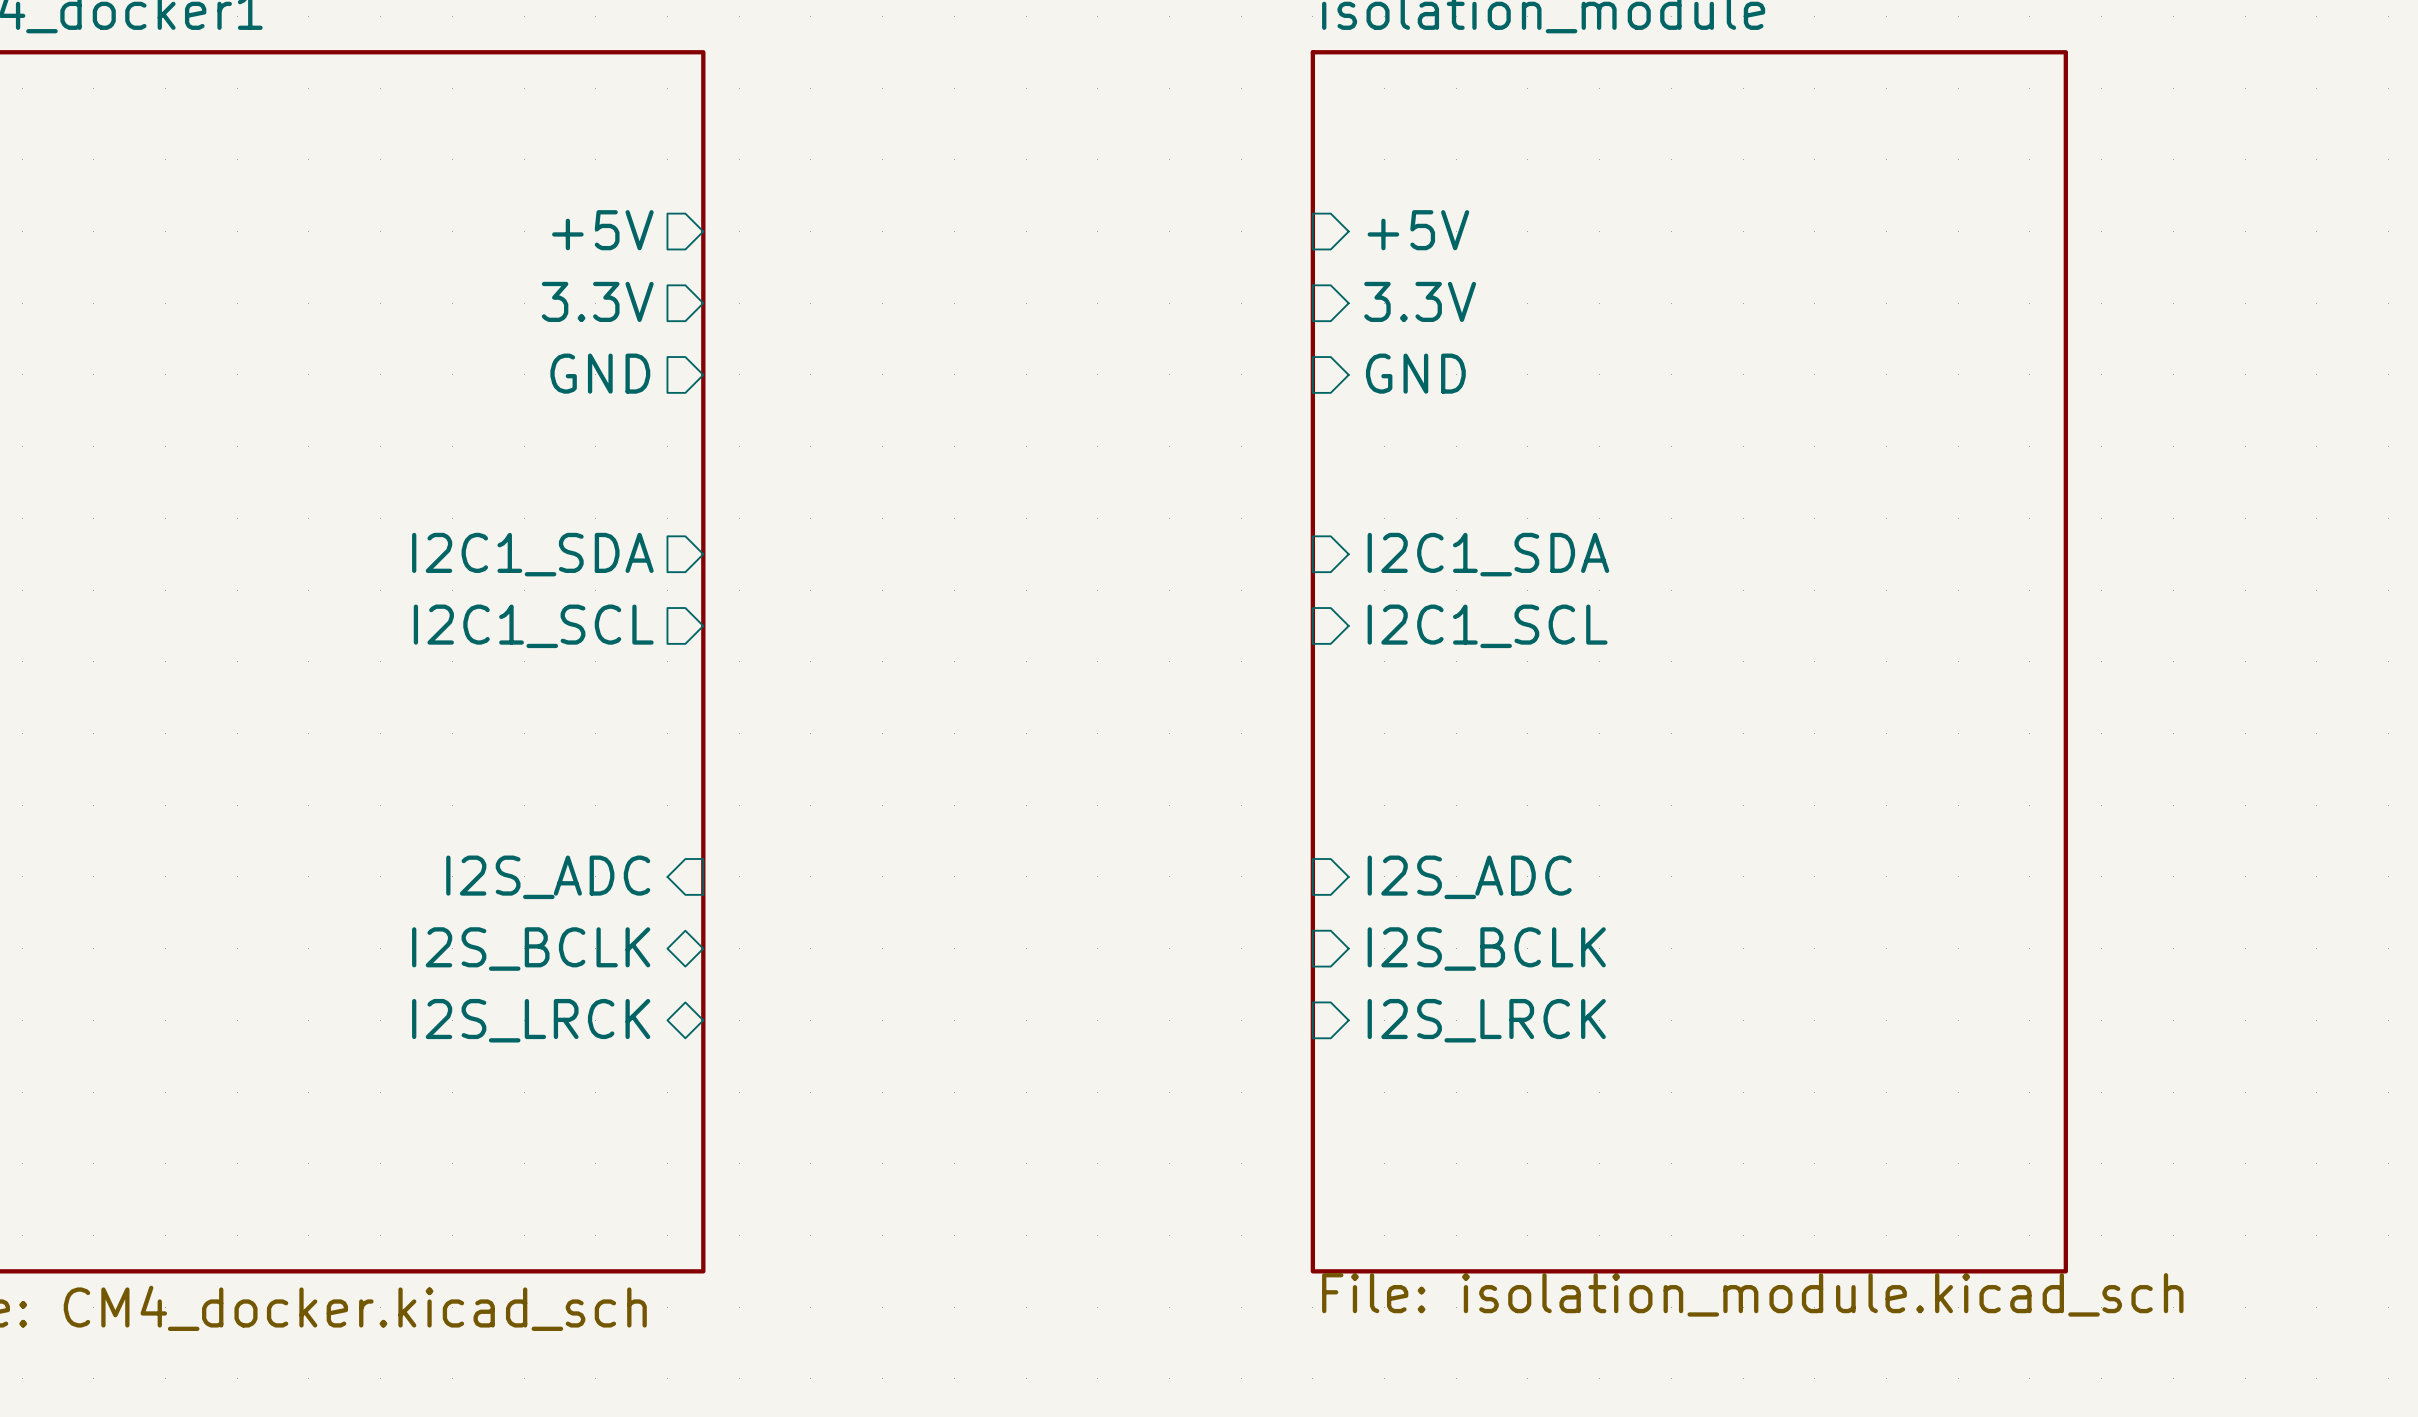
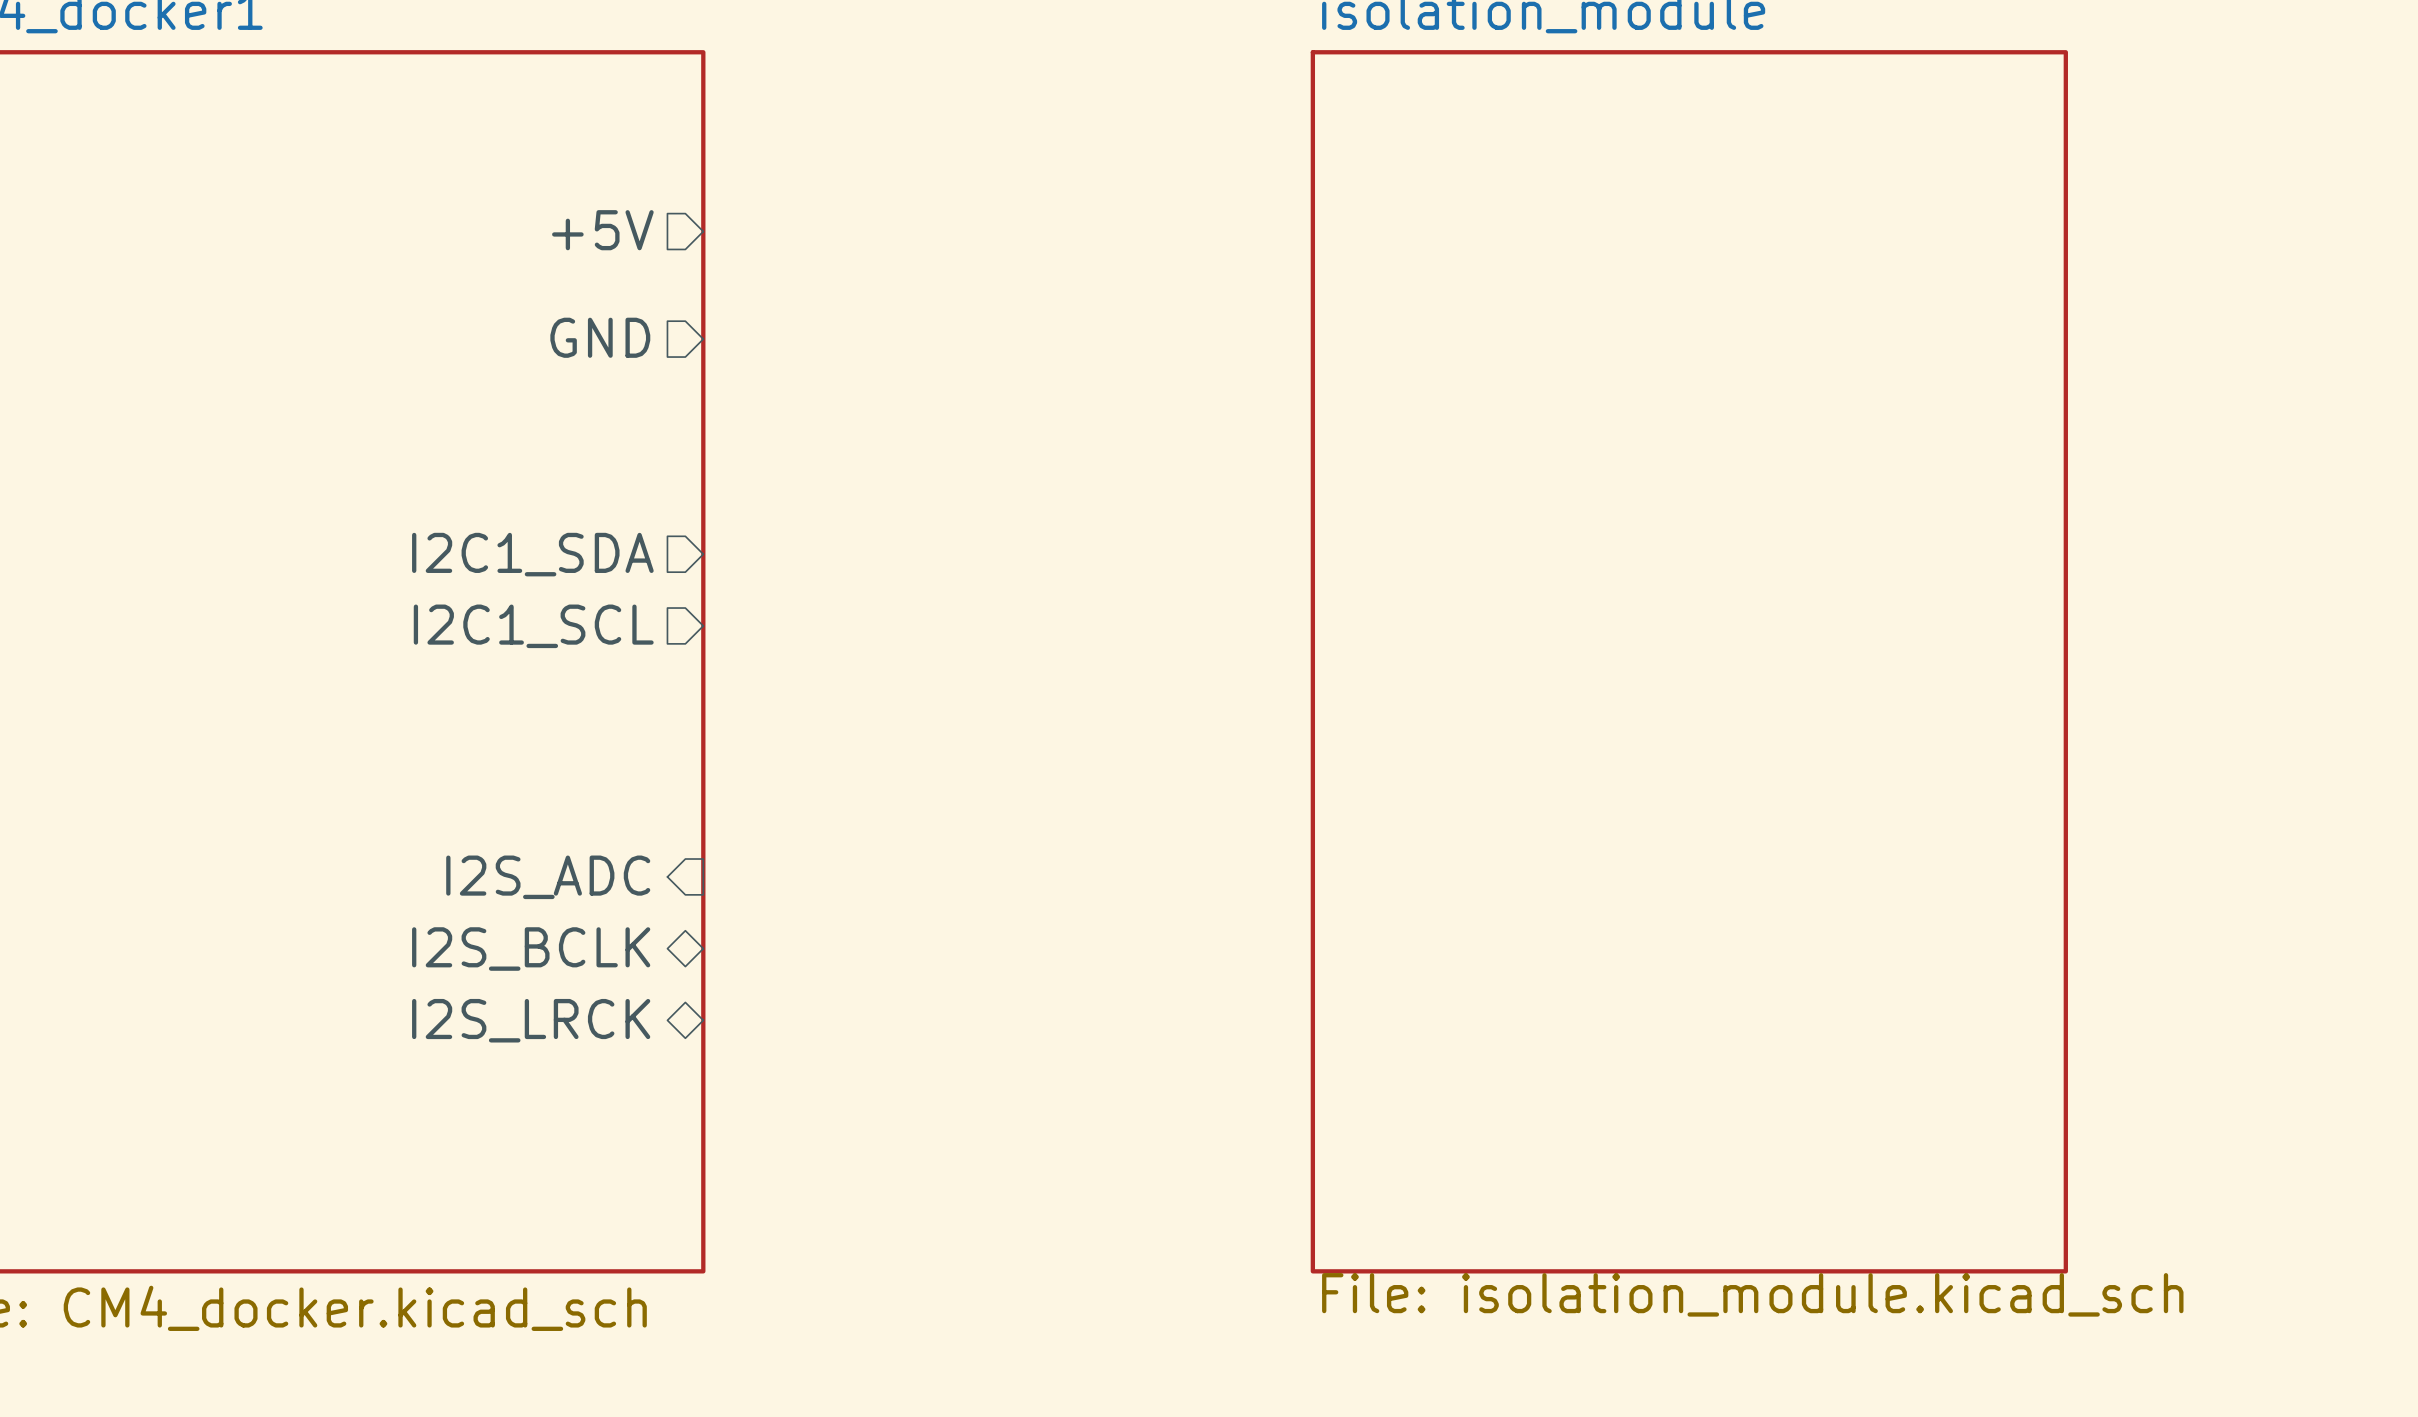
sheet pin: +5V (1418, 230) -> none
sheet pin: 3.3V (597, 301) -> none
sheet pin: 3.3V (1420, 301) -> none
sheet pin position: GND (600, 373) -> GND (600, 337)
sheet pin: GND (1415, 373) -> none
sheet pin: I2C1_SDA (1488, 554) -> none
sheet pin: I2C1_SCL (1487, 626) -> none
sheet pin: I2S_ADC (1469, 877) -> none
sheet pin: I2S_BCLK (1486, 949) -> none
sheet pin: I2S_LRCK (1486, 1020) -> none

